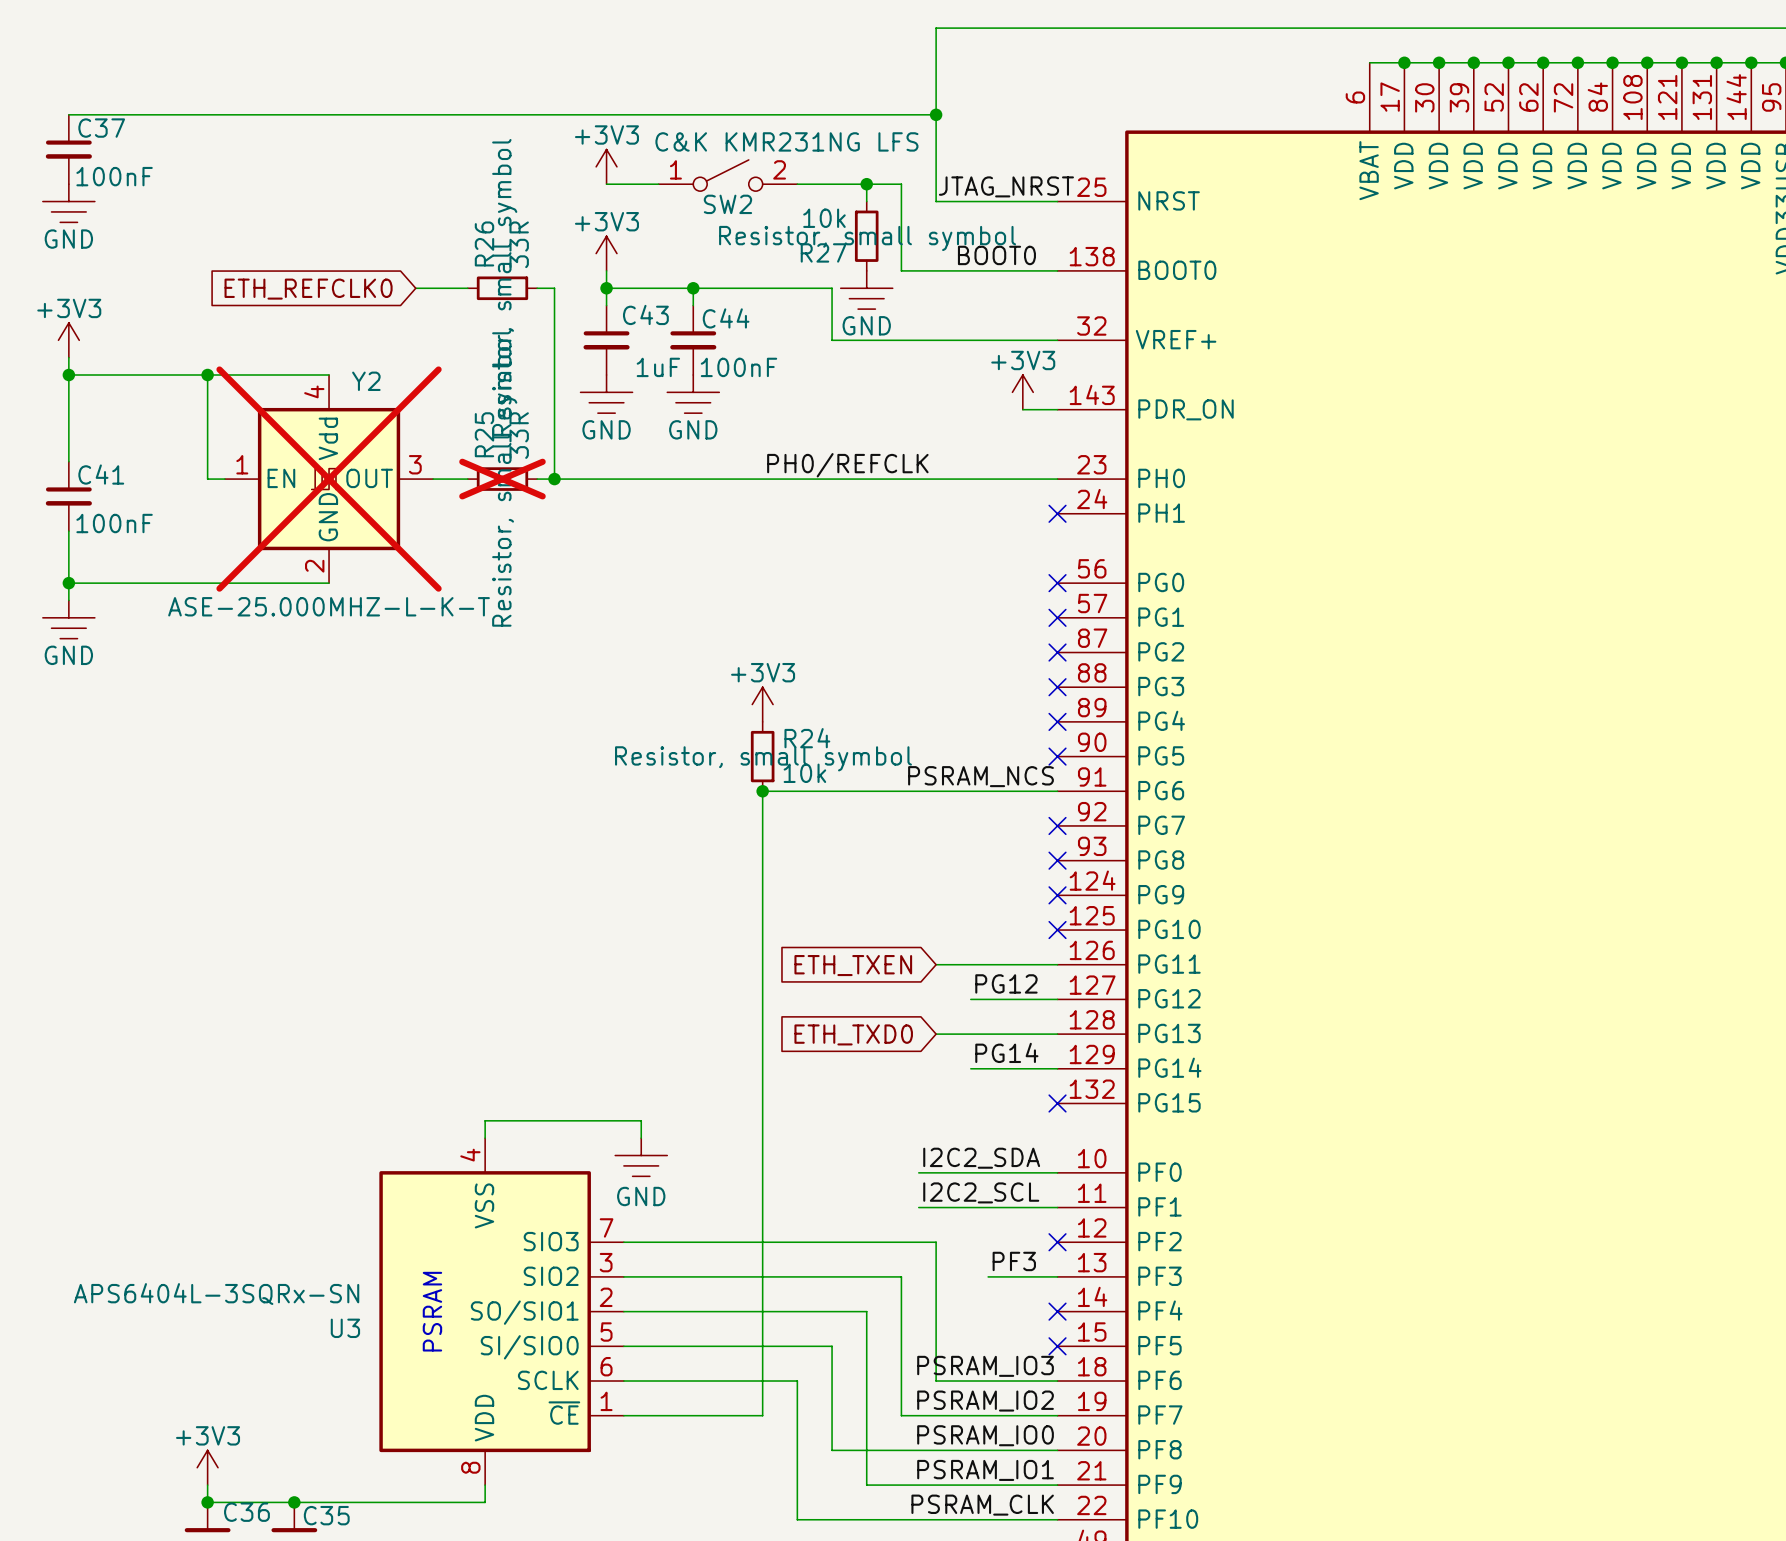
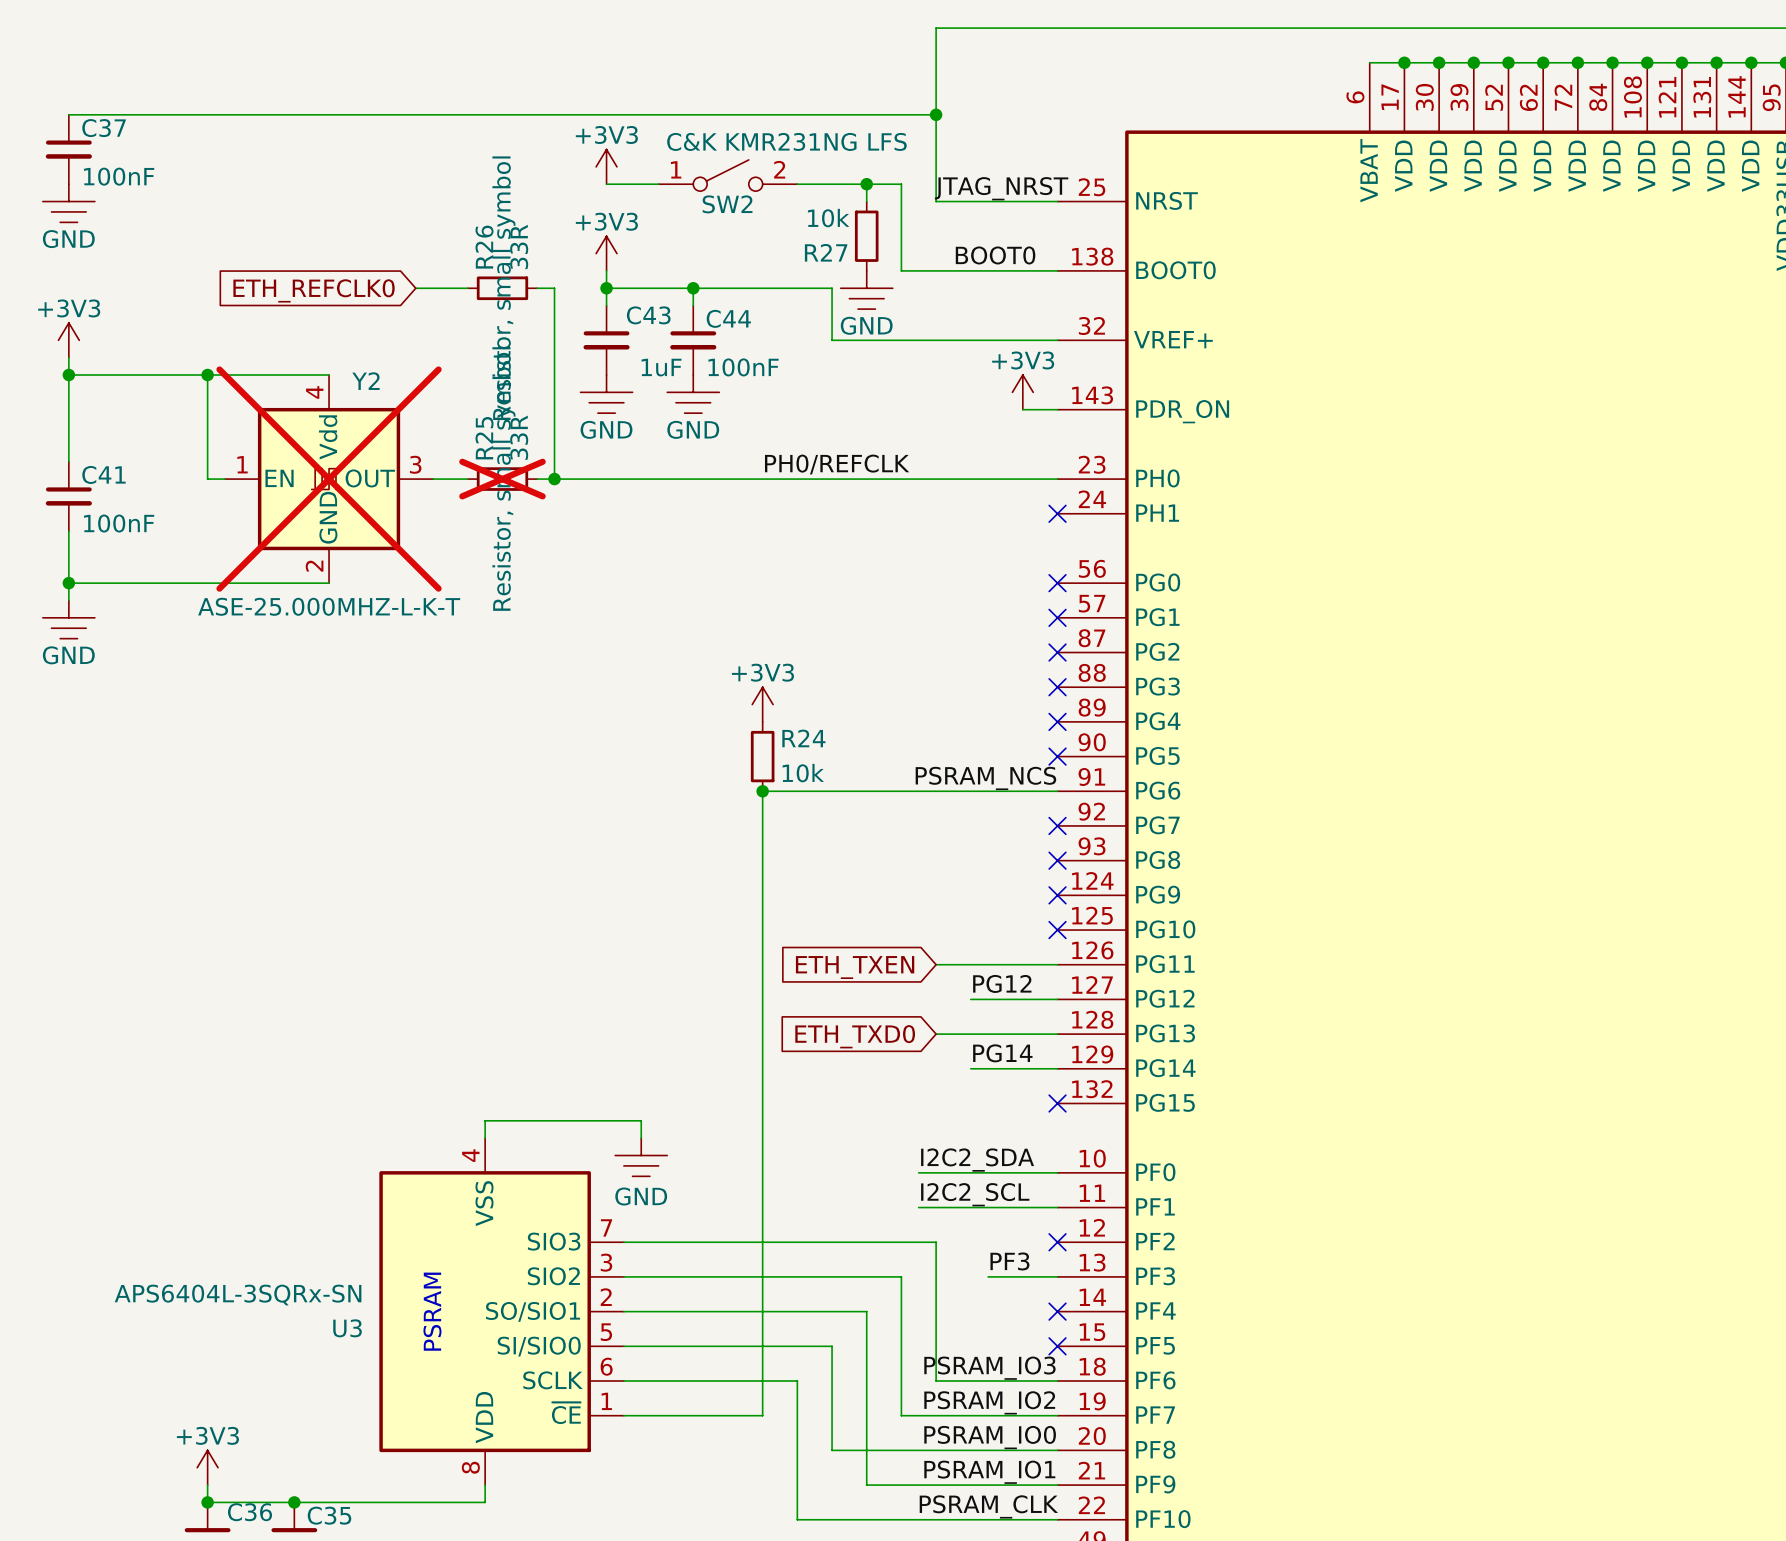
R27 text: Resistor, small symbol (867, 238) -> none
R24 text: Resistor, small symbol (763, 758) -> none

